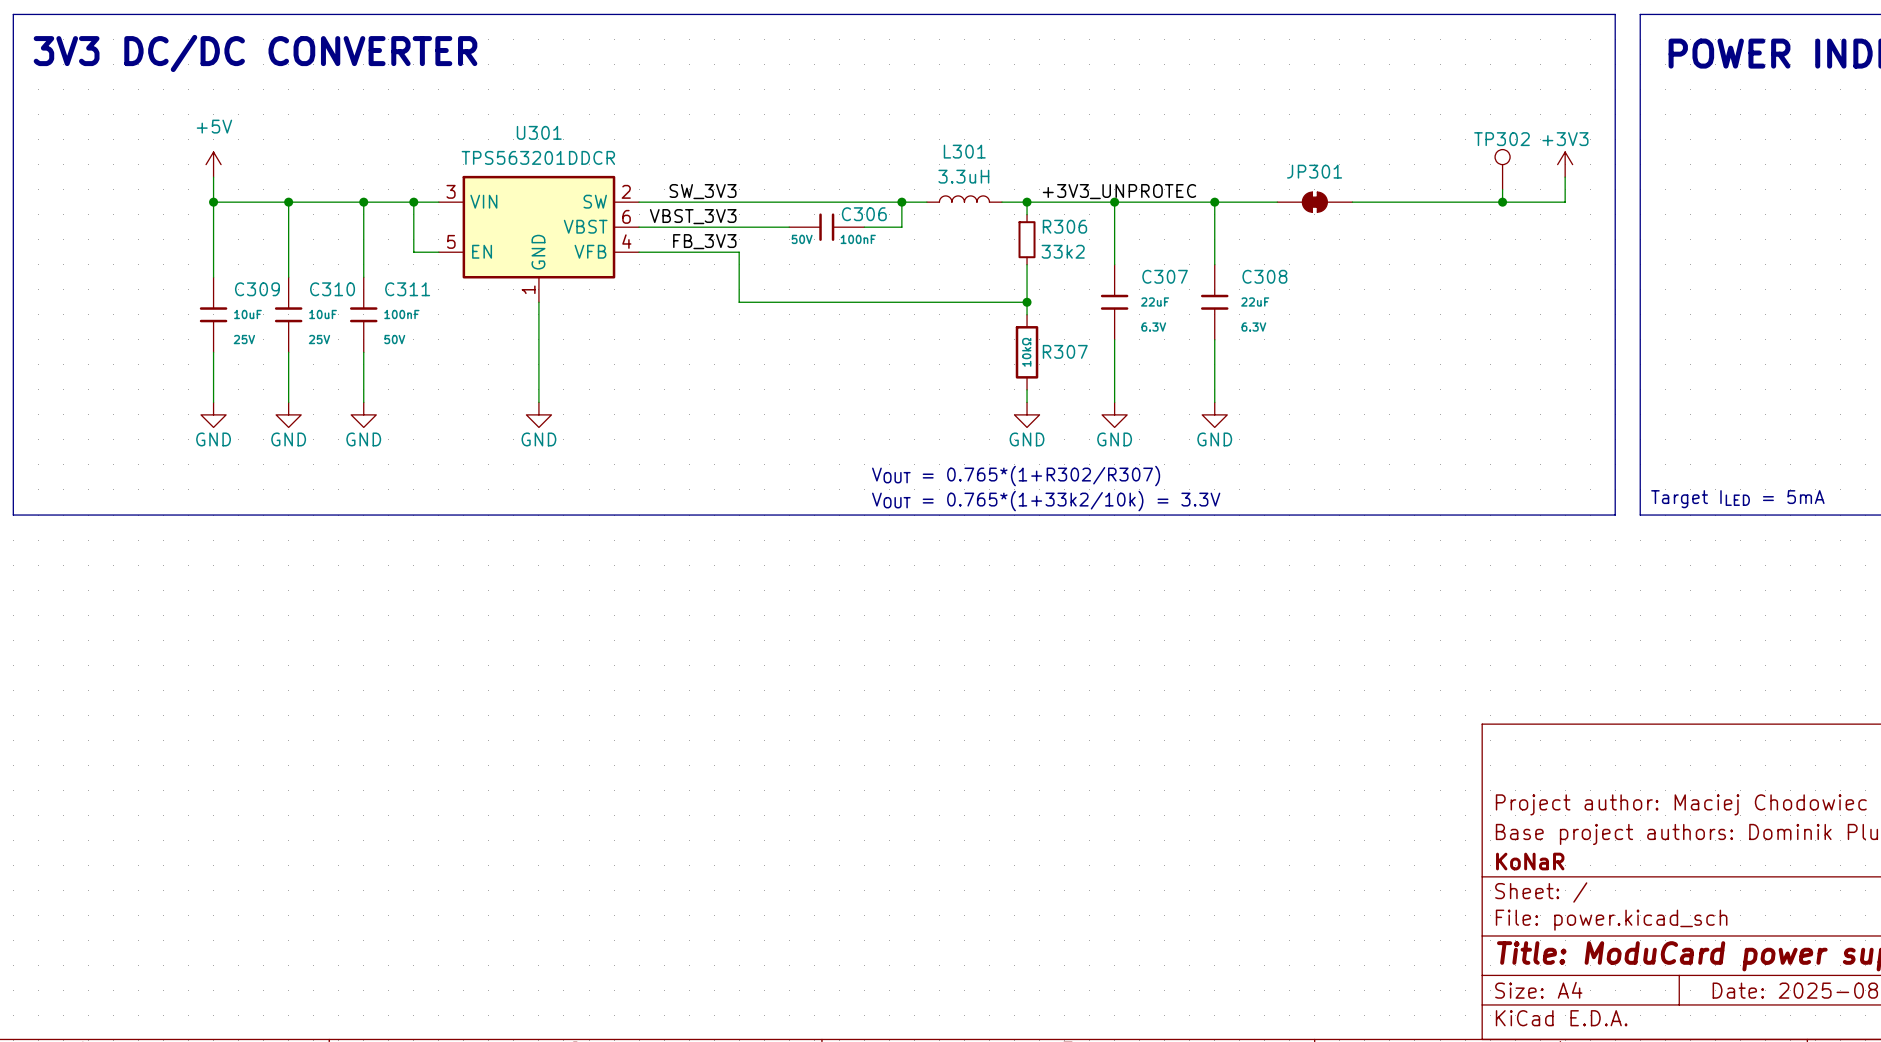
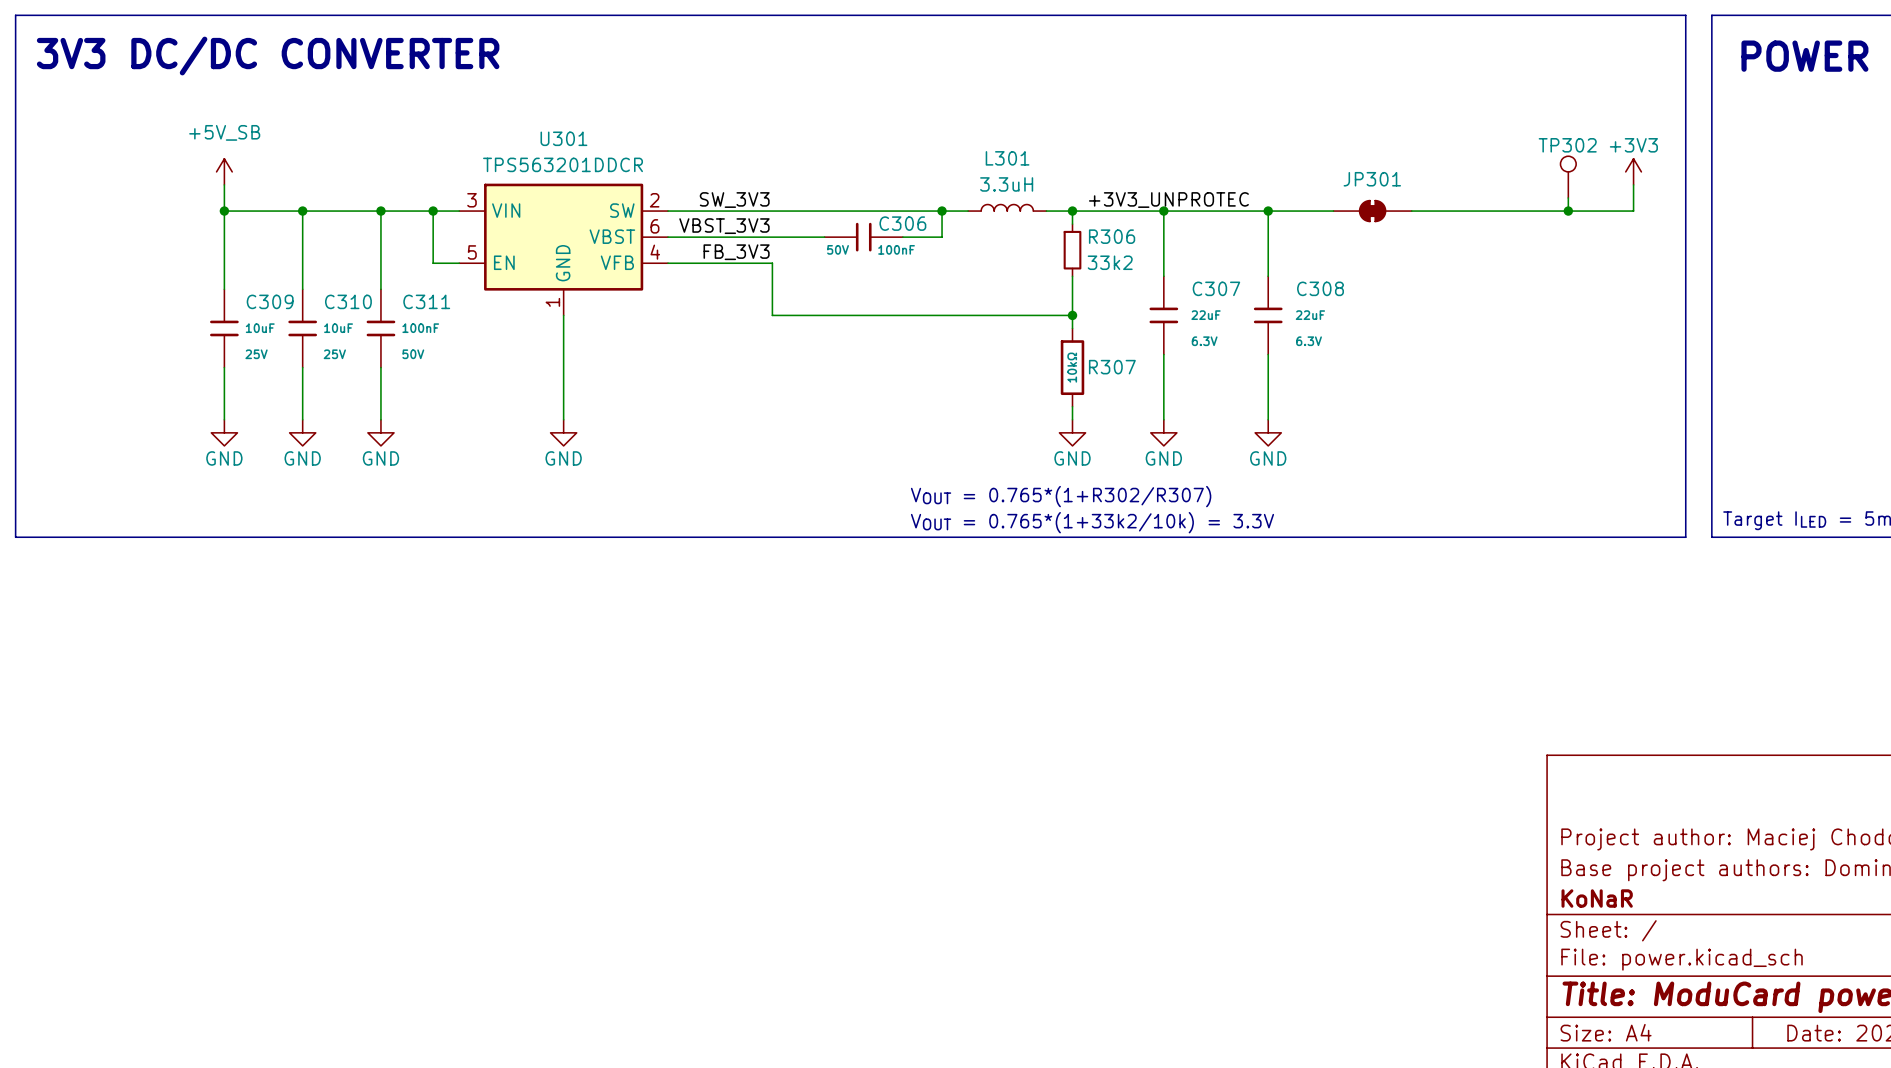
power symbol: +5V (213, 164) -> +5V_SB (224, 171)

